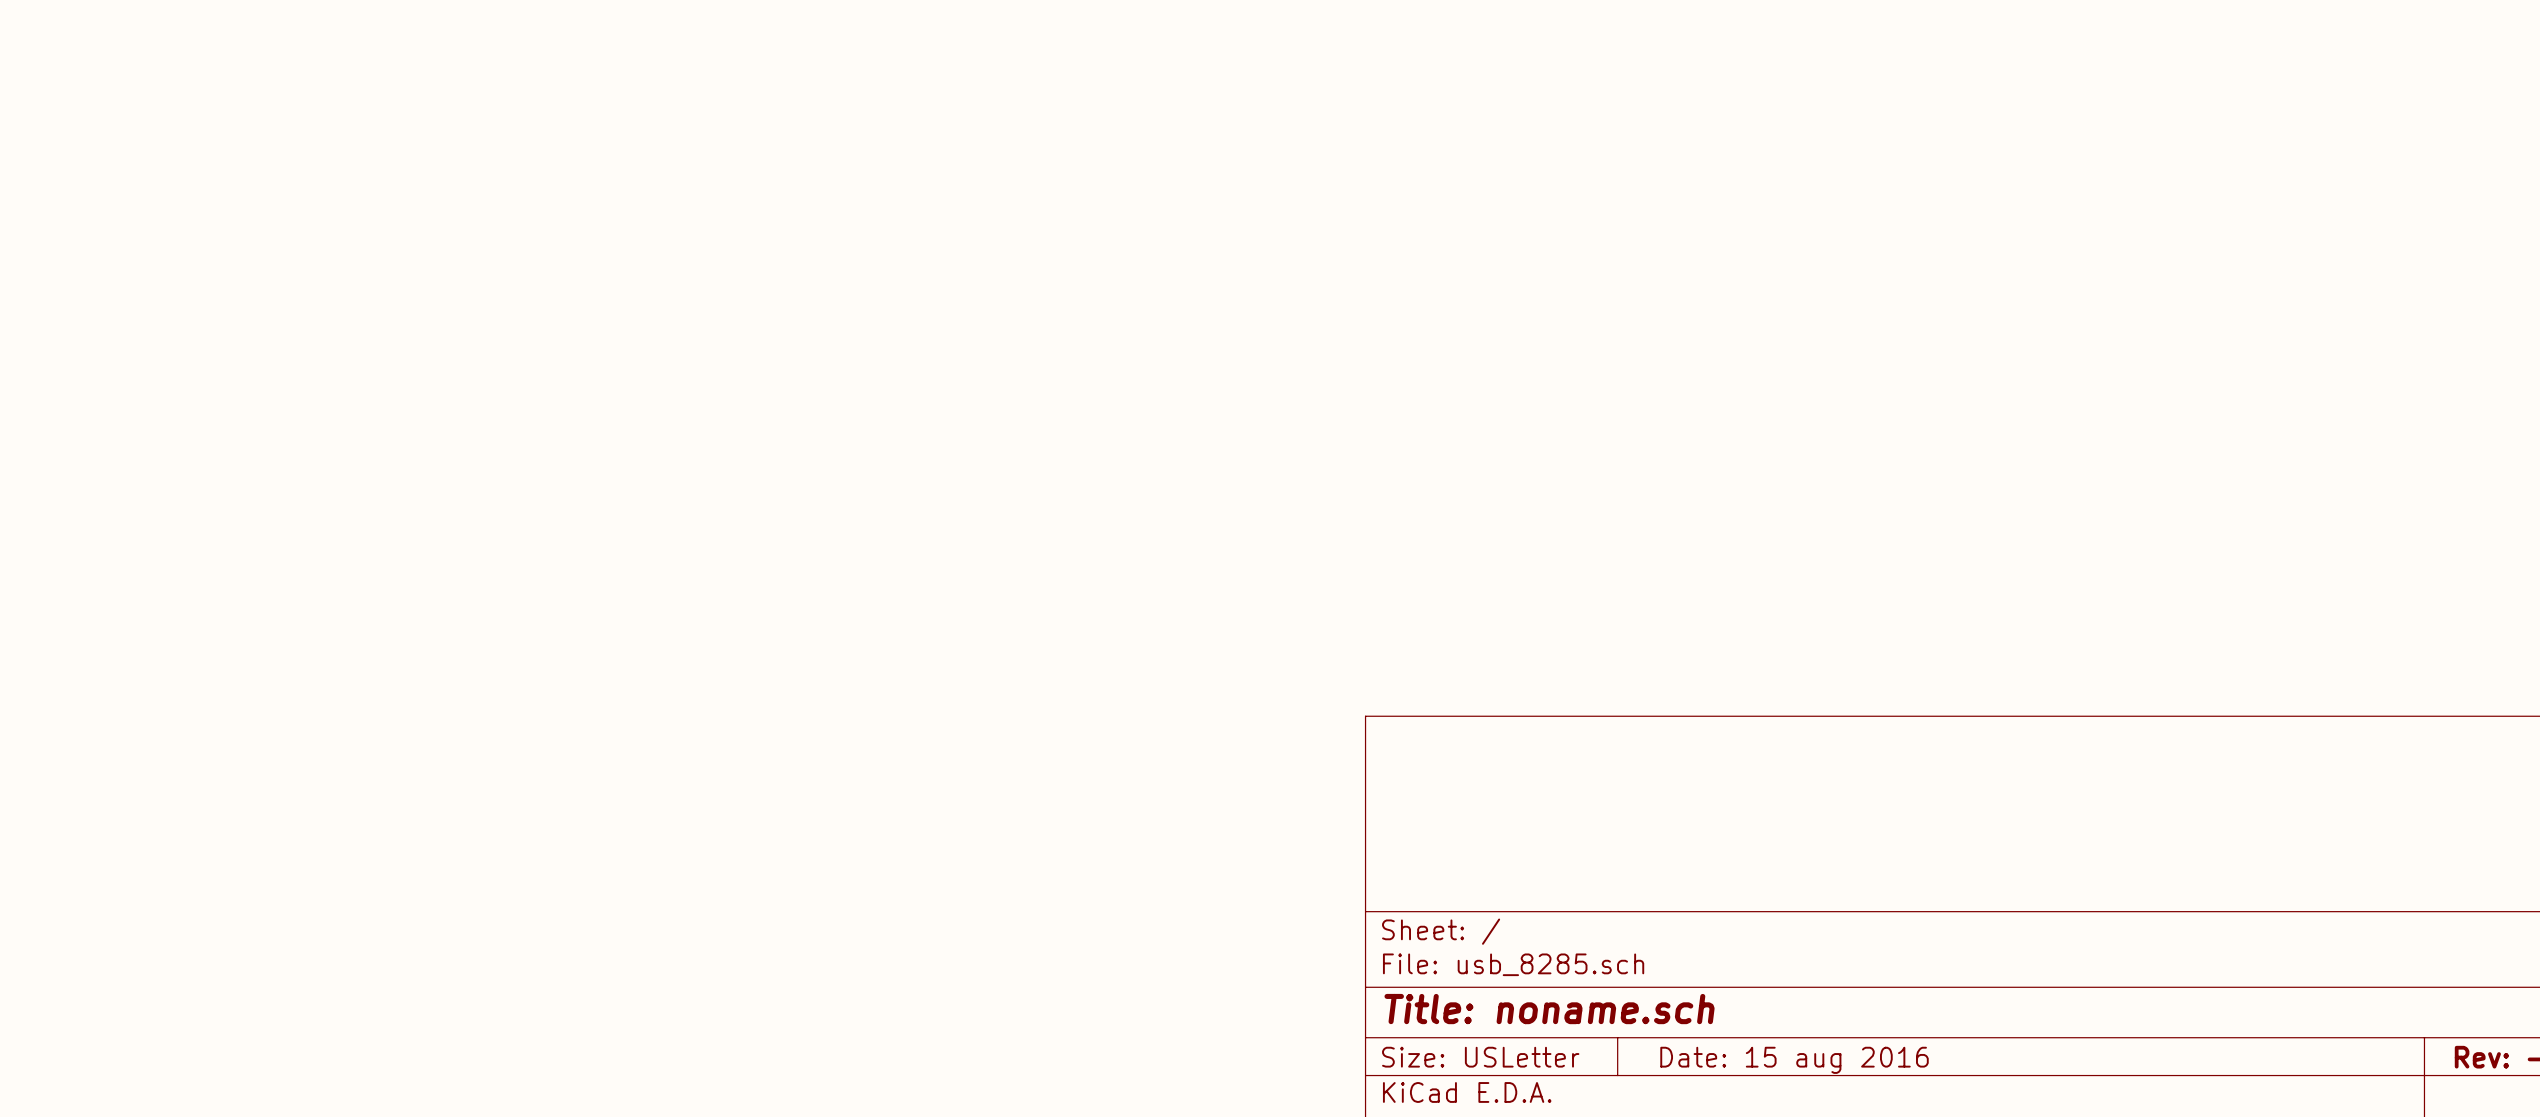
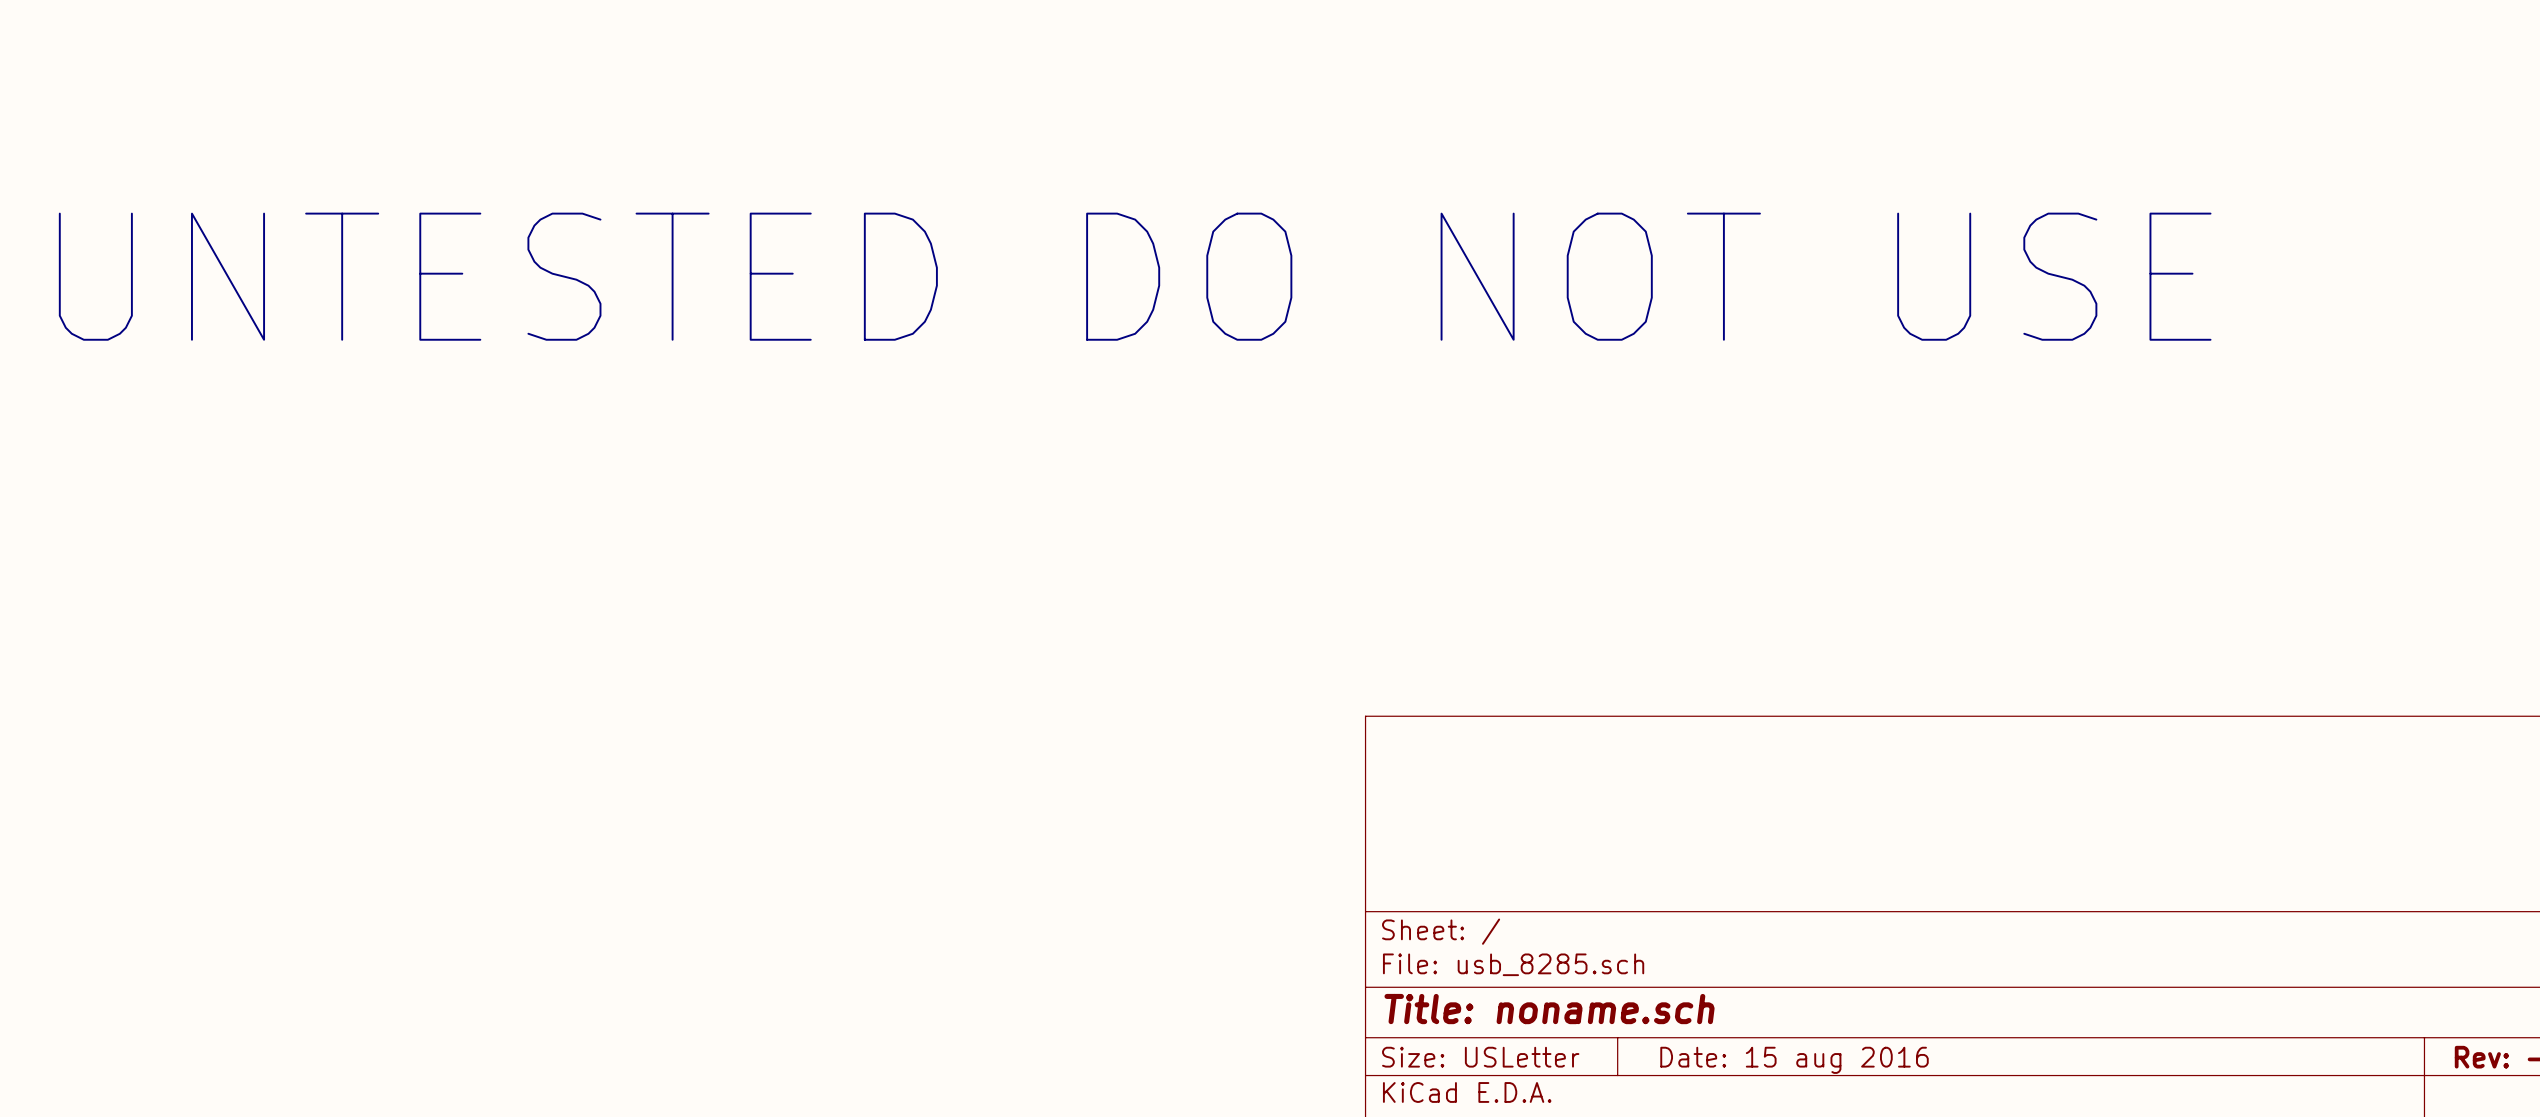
text: none -> UNTESTED DO NOT USE (1135, 276)

